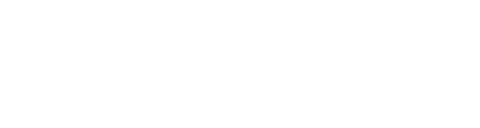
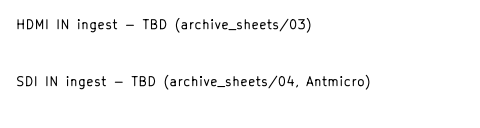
text: none -> HDMI IN ingest - TBD (archive_sheets/03) (163, 25)
text: none -> SDI IN ingest - TBD (archive_sheets/04, Antmicro) (193, 82)

